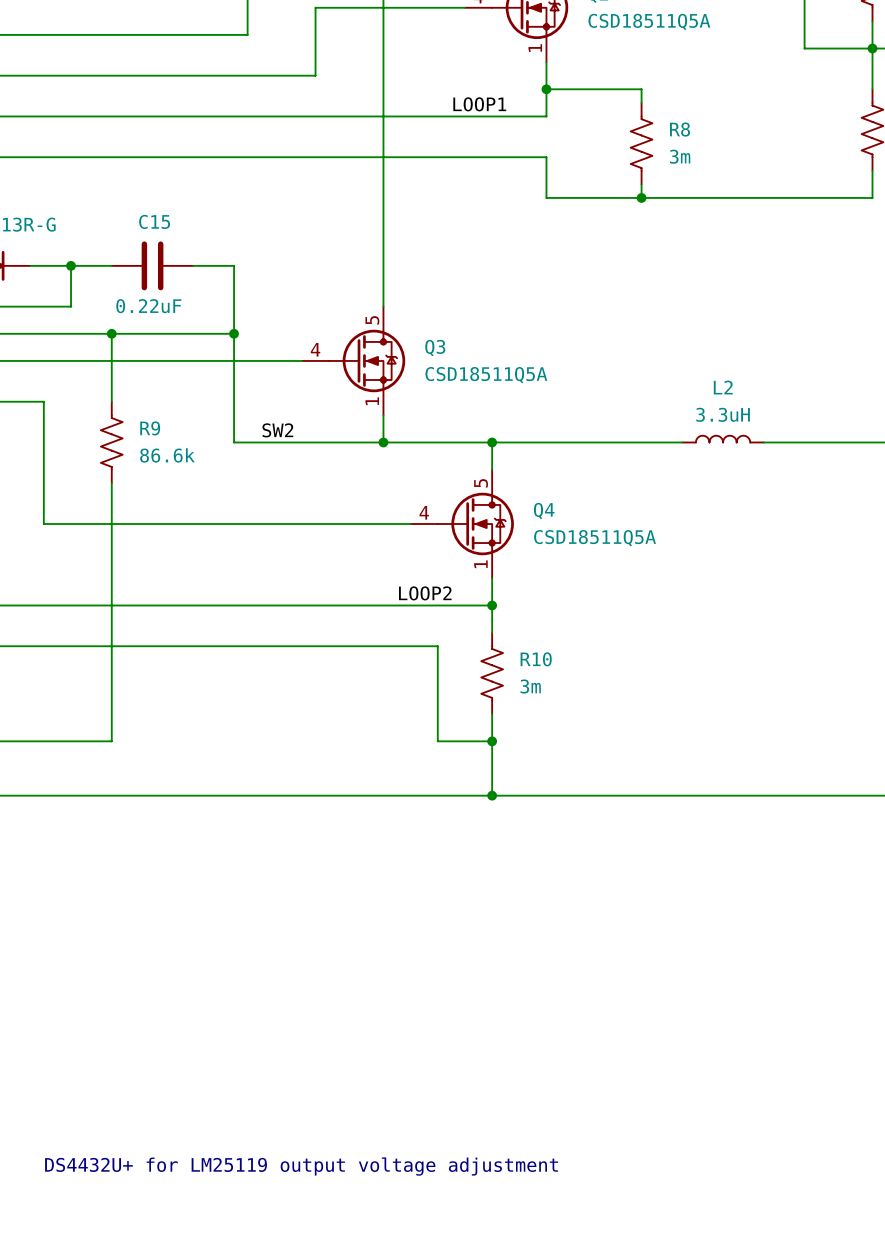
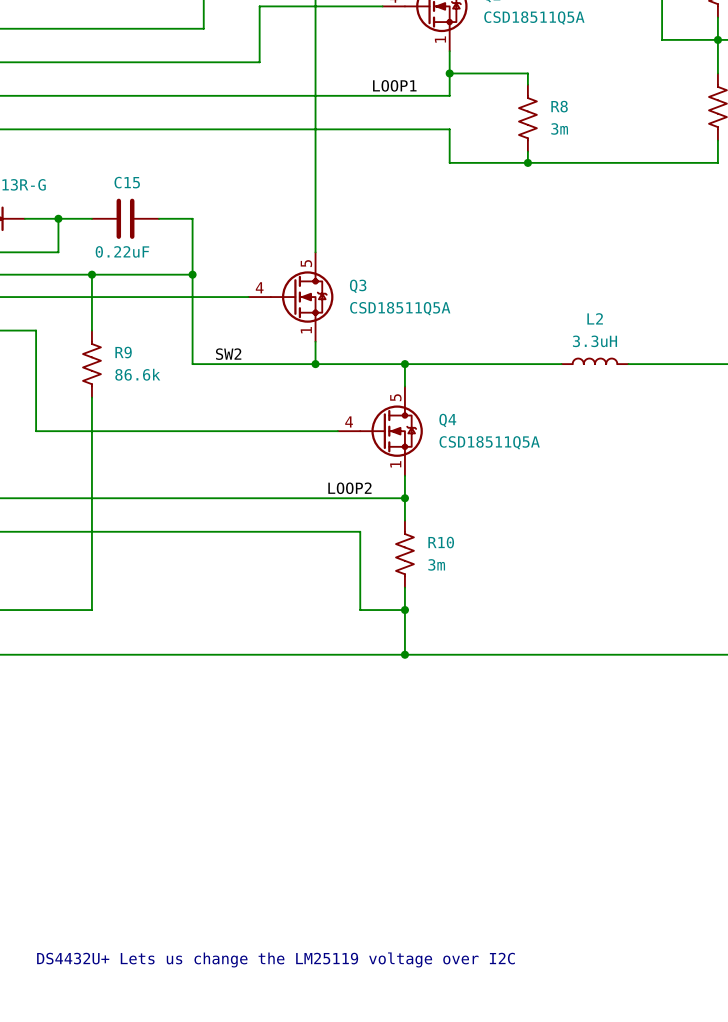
text: DS4432U+ for LM25119 output voltage adjustment (301, 1166) -> DS4432U+ Lets us change the LM25119 voltage over I2C (276, 959)

